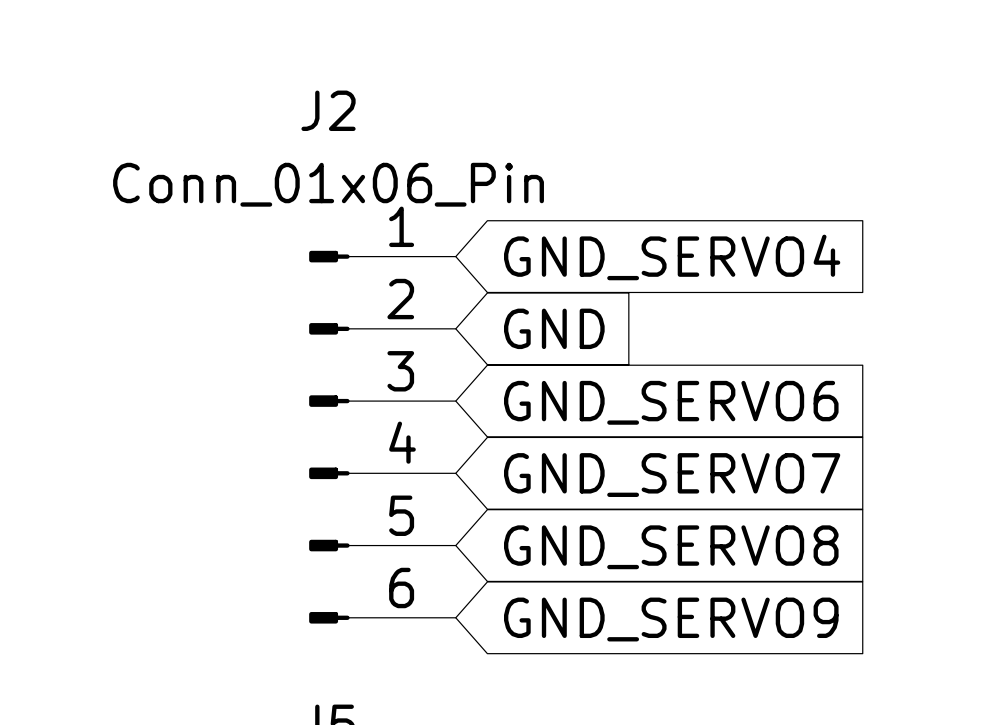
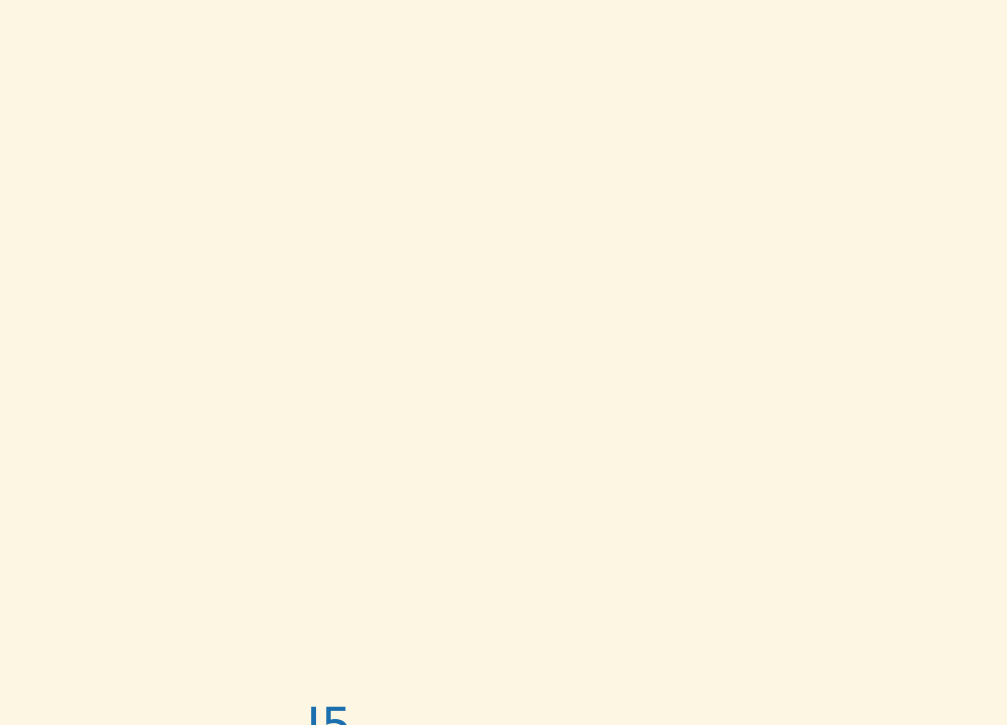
global label: GND_SERVO4 (672, 257) -> none
global label: GND (554, 328) -> none
global label: GND_SERVO6 (671, 402) -> none
J2: Conn_01x06_Pin (382, 437) -> none
global label: GND_SERVO7 (672, 475) -> none
global label: GND_SERVO8 (671, 547) -> none
global label: GND_SERVO9 (671, 619) -> none

